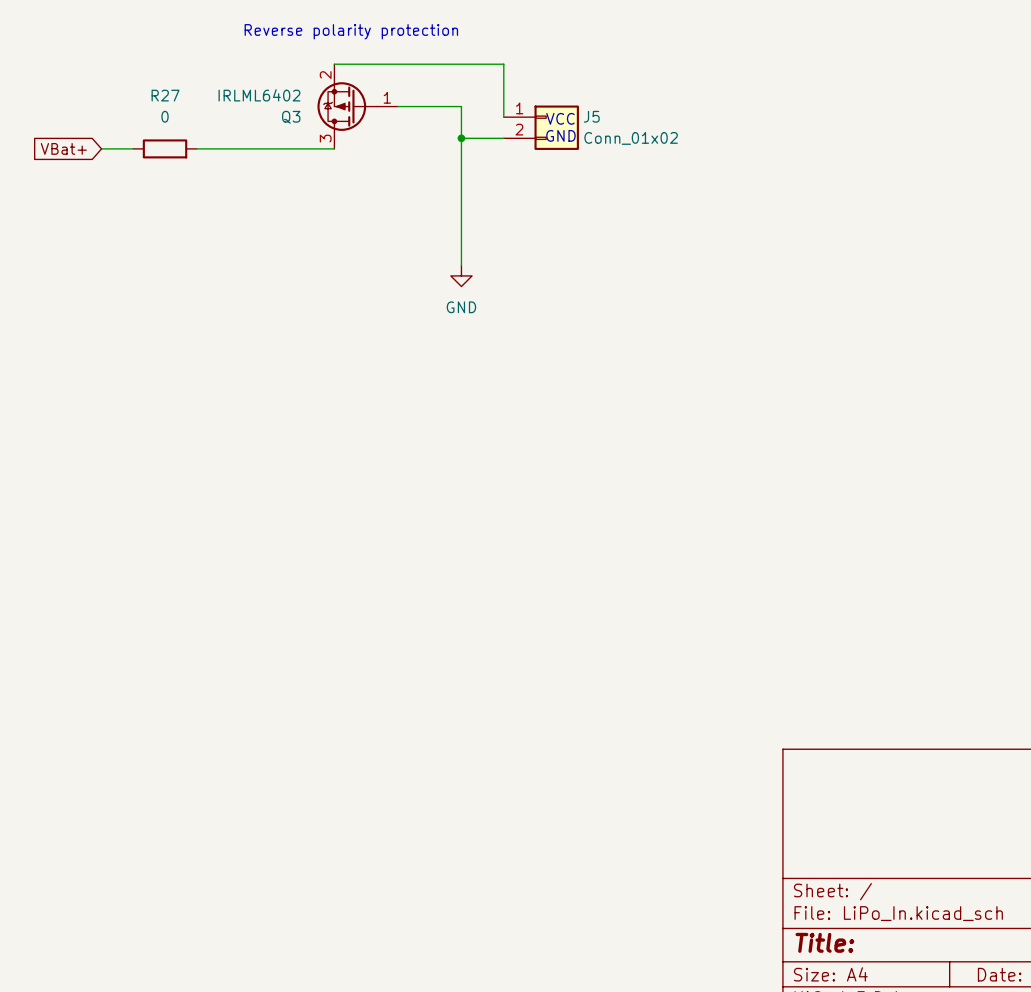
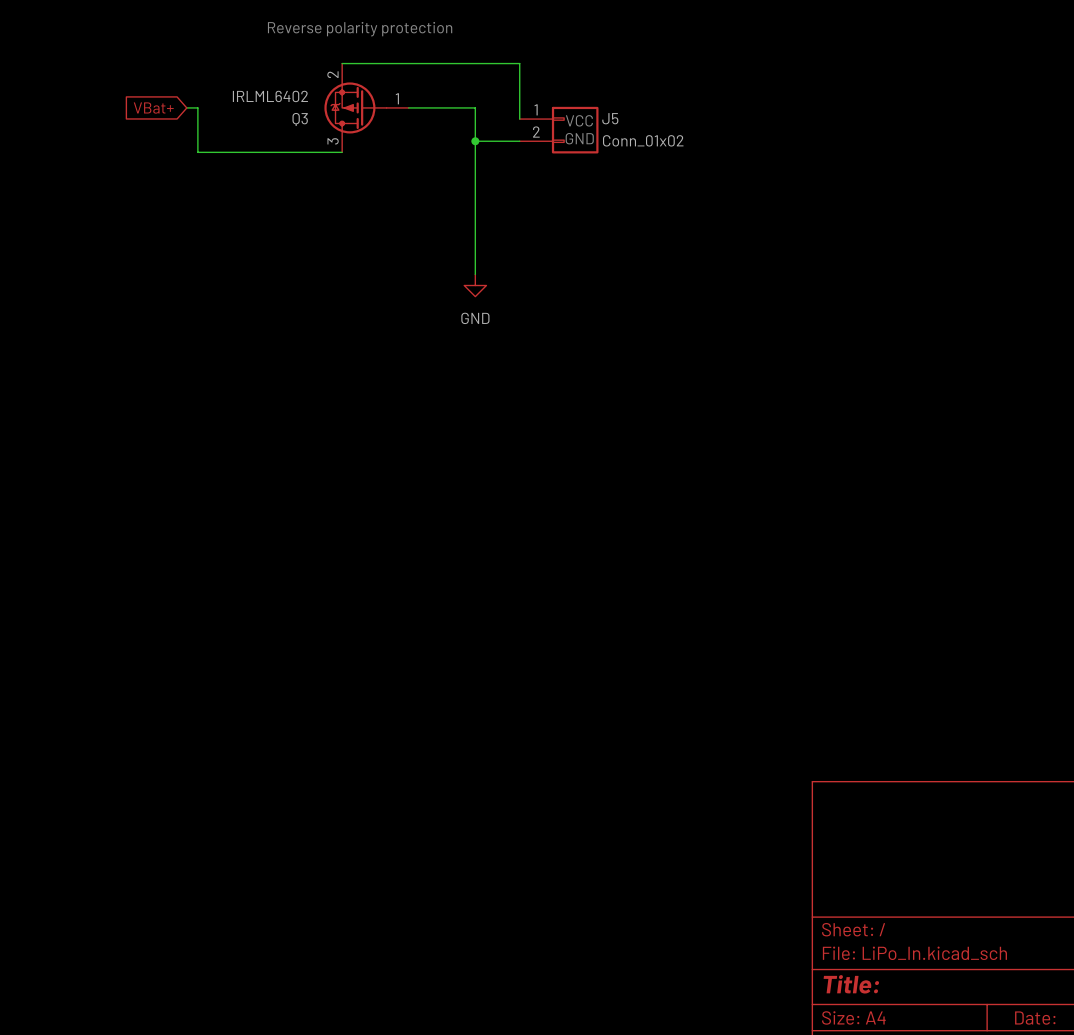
wire: none -> (186, 107) (197, 107) (197, 152)
global label position: VBat+ (63, 148) -> VBat+ (153, 108)
wire: (101, 148) (133, 148) -> none
R27: 0 (165, 148) -> none

